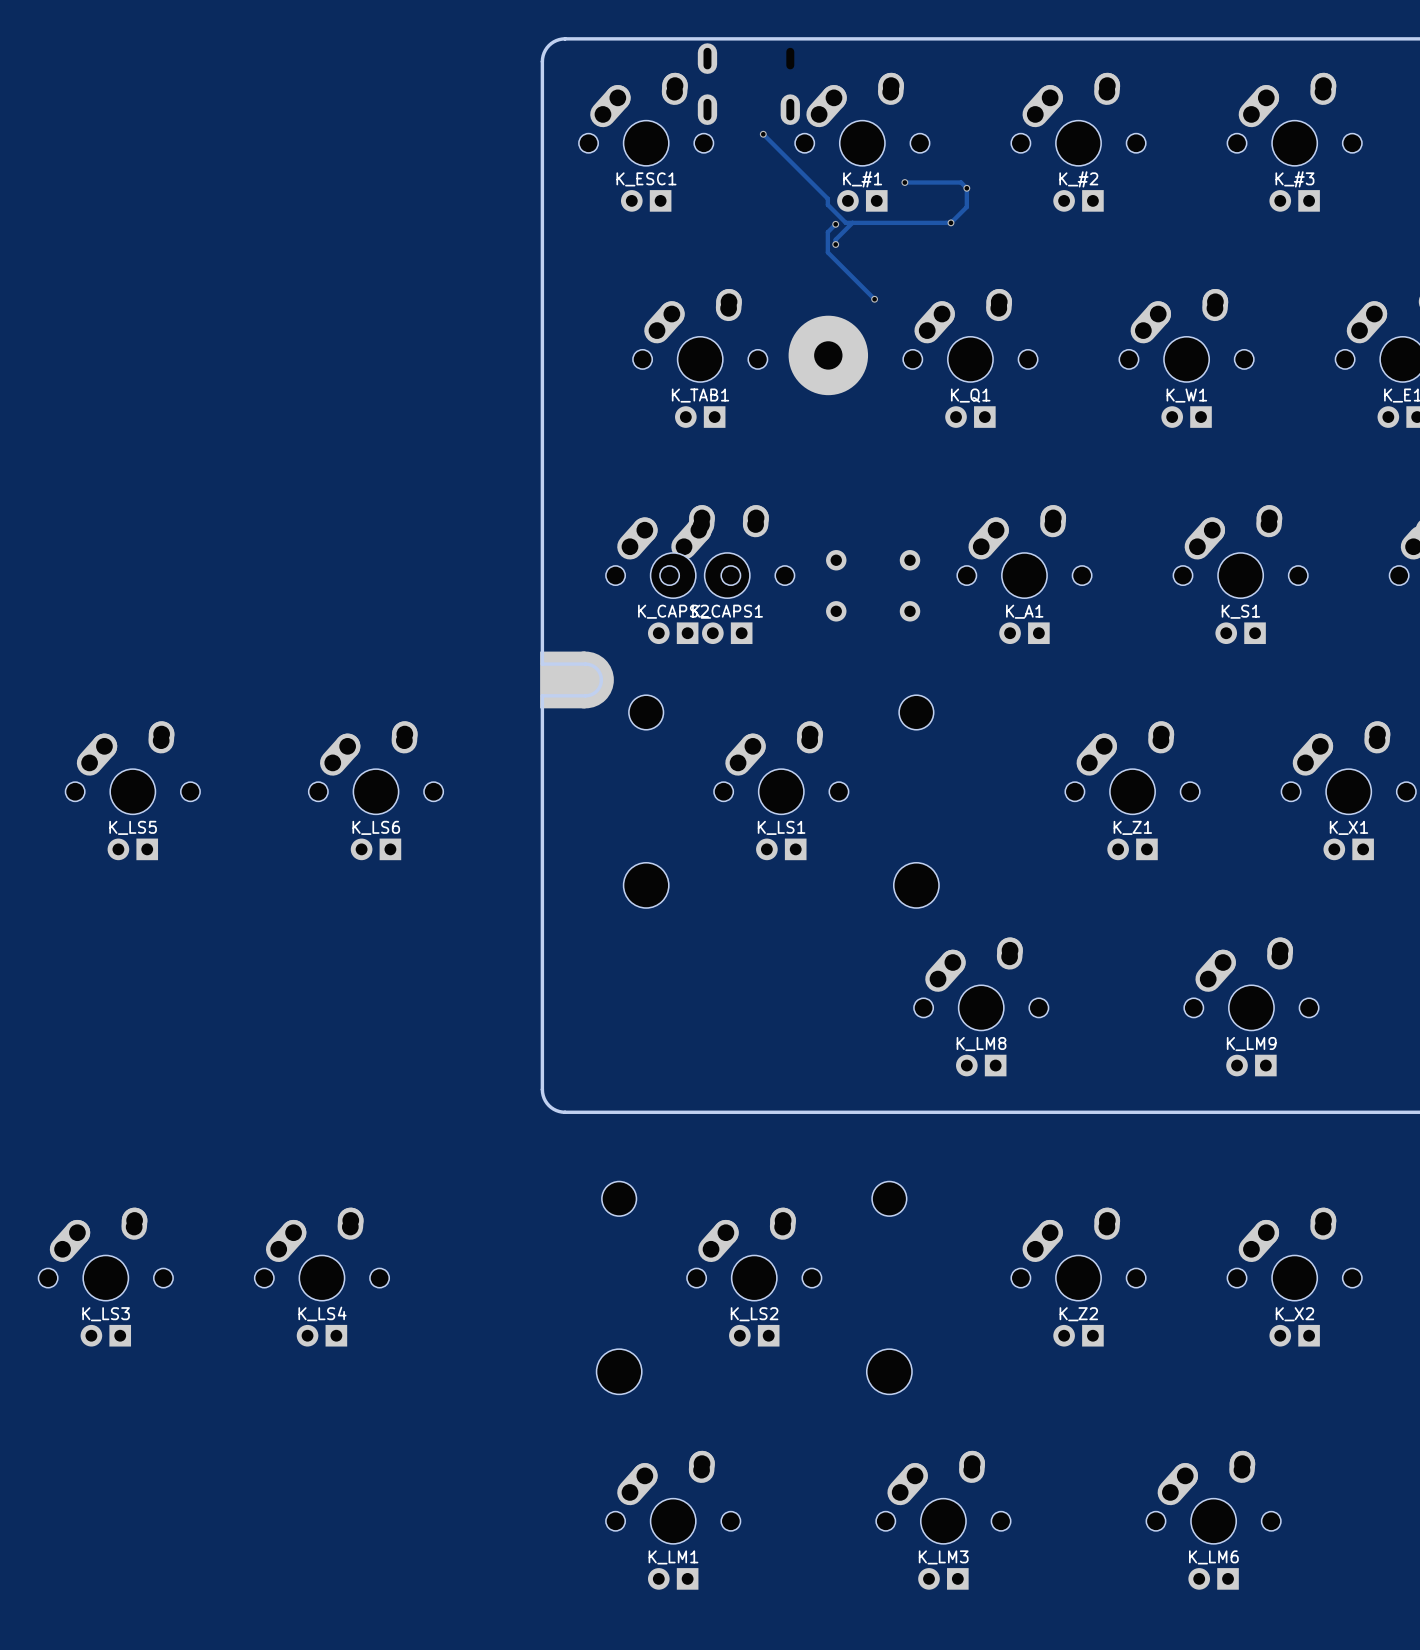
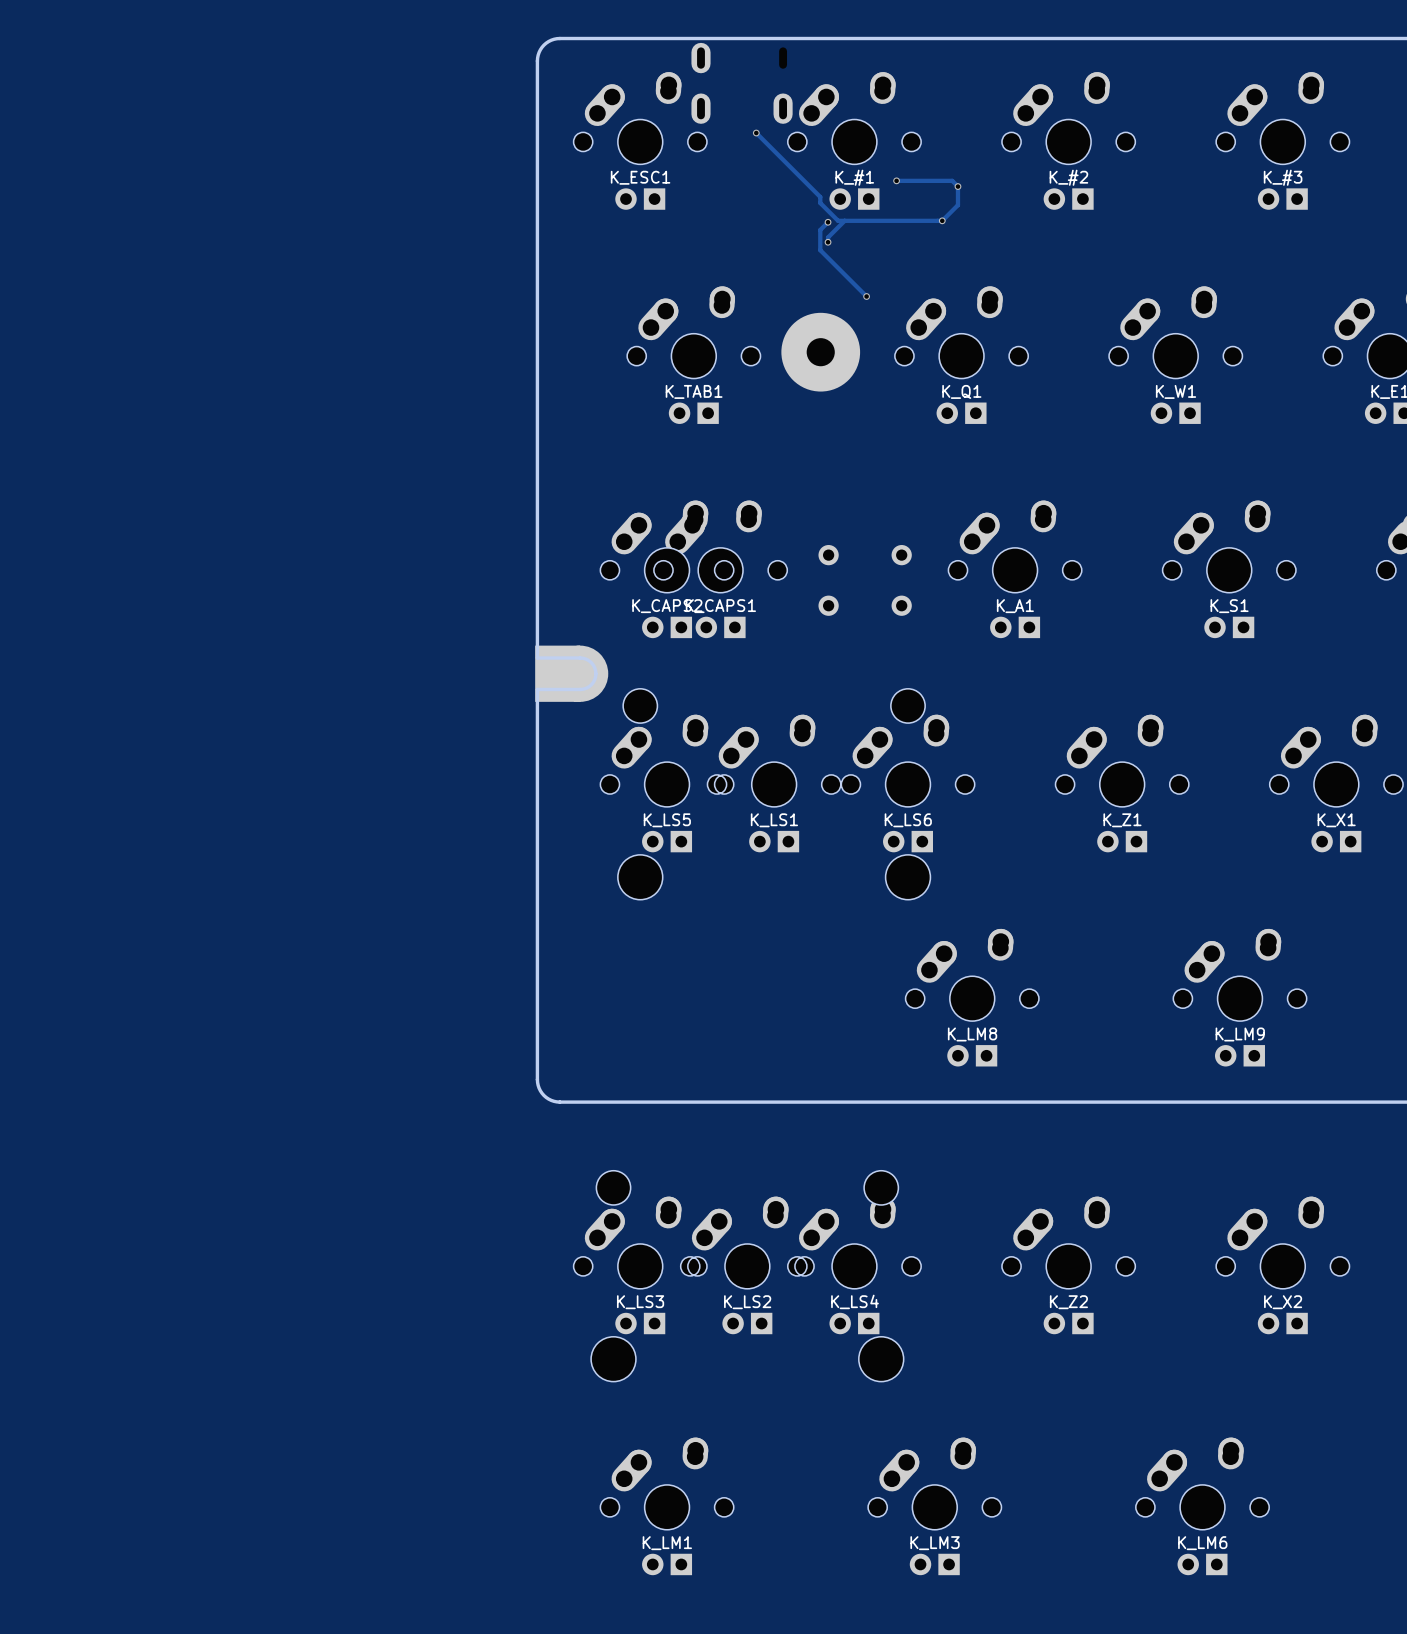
K_LS5 position: (132, 790) -> (667, 783)
K_LS6 position: (376, 790) -> (908, 783)
K_LS3 position: (105, 1277) -> (640, 1265)
K_LS4 position: (321, 1277) -> (854, 1265)

